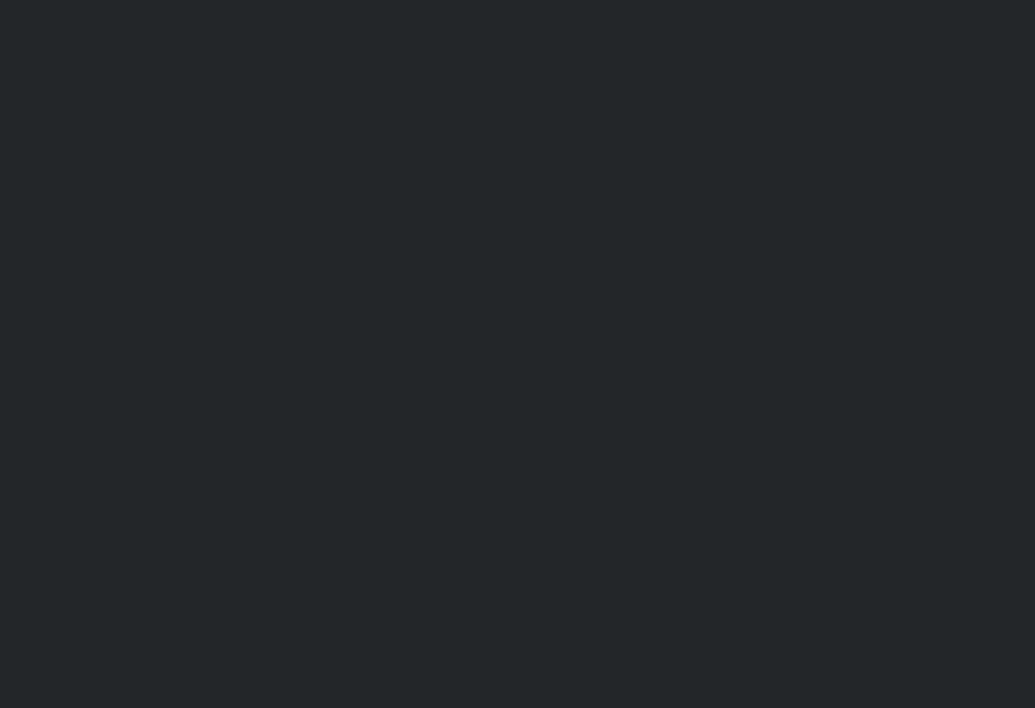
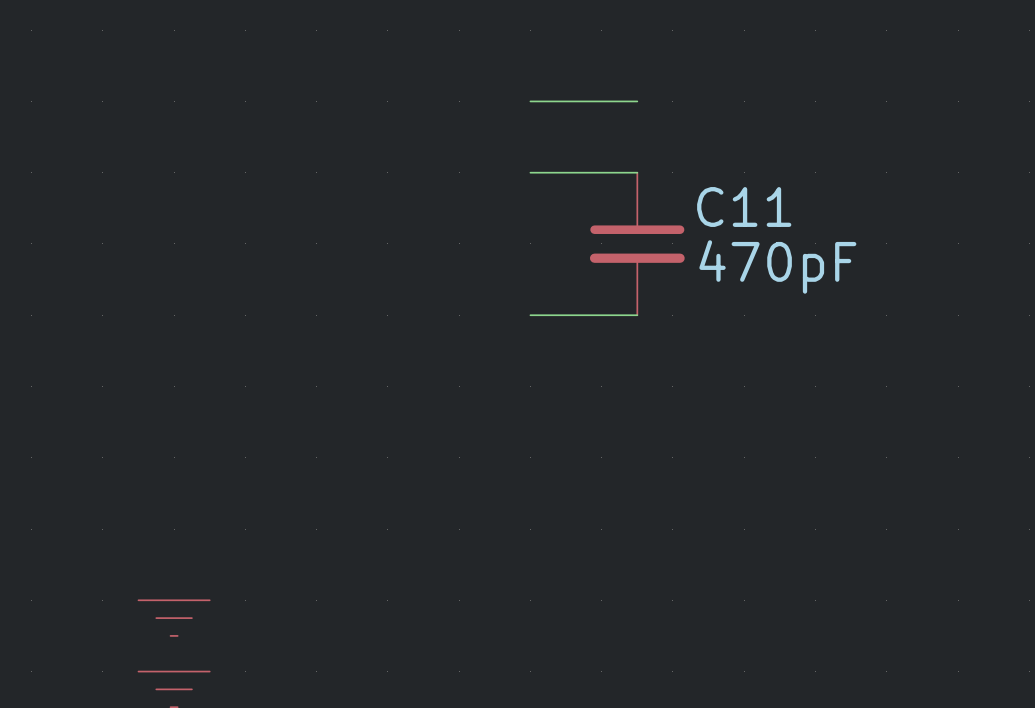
wire: none -> (530, 101) (637, 101)
wire: none -> (530, 172) (637, 172)
C11: none -> 470pF (637, 243)
wire: none -> (530, 315) (637, 315)
power symbol: none -> (174, 618)
power symbol: none -> (174, 689)

